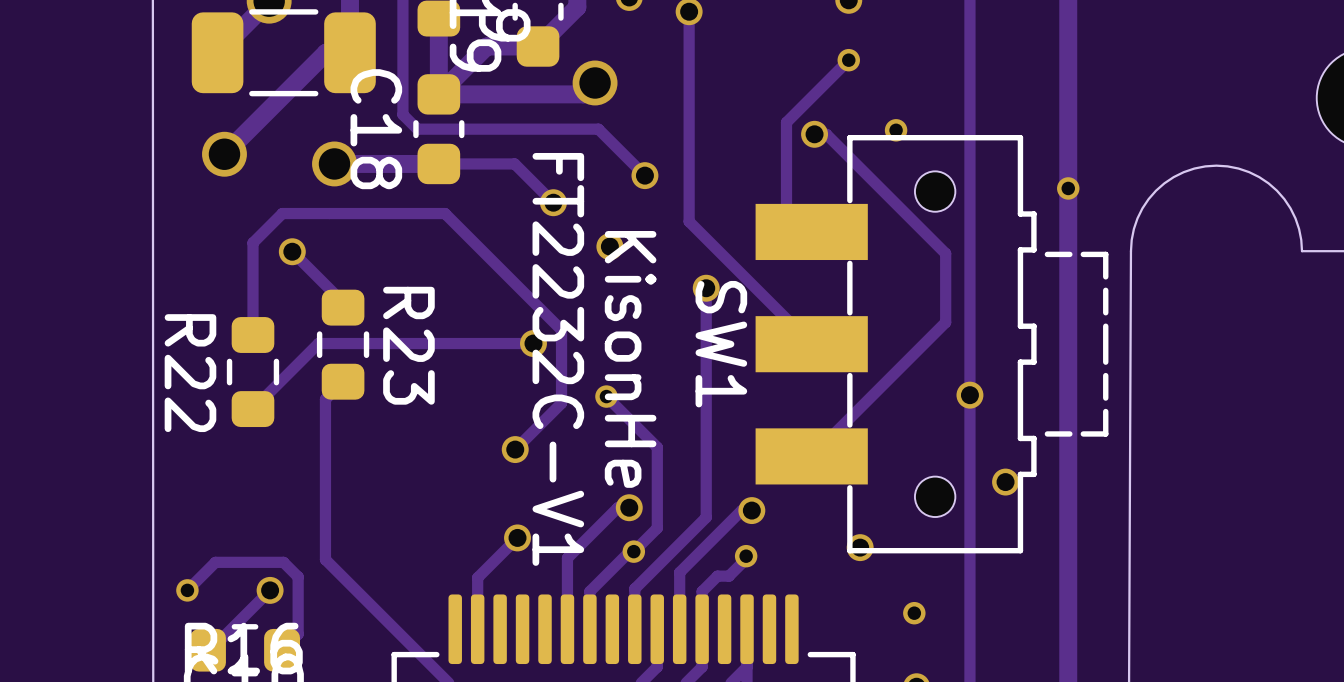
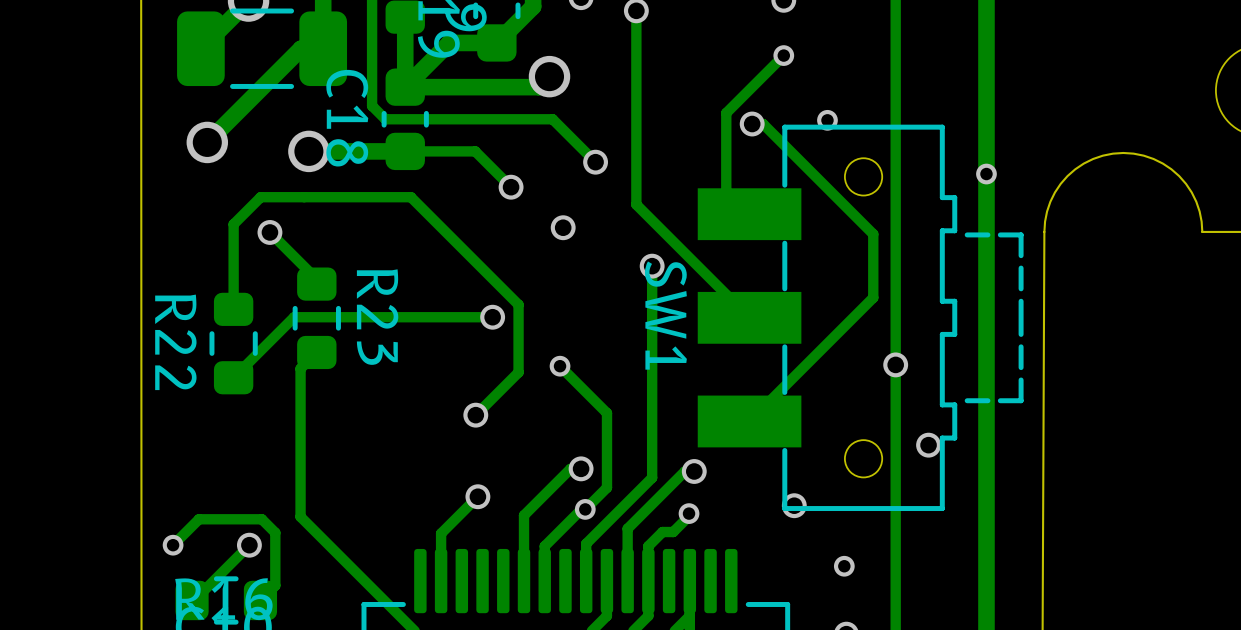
text: FT2232C-V1 (558, 359) -> none
text: KisonHe (630, 359) -> none

